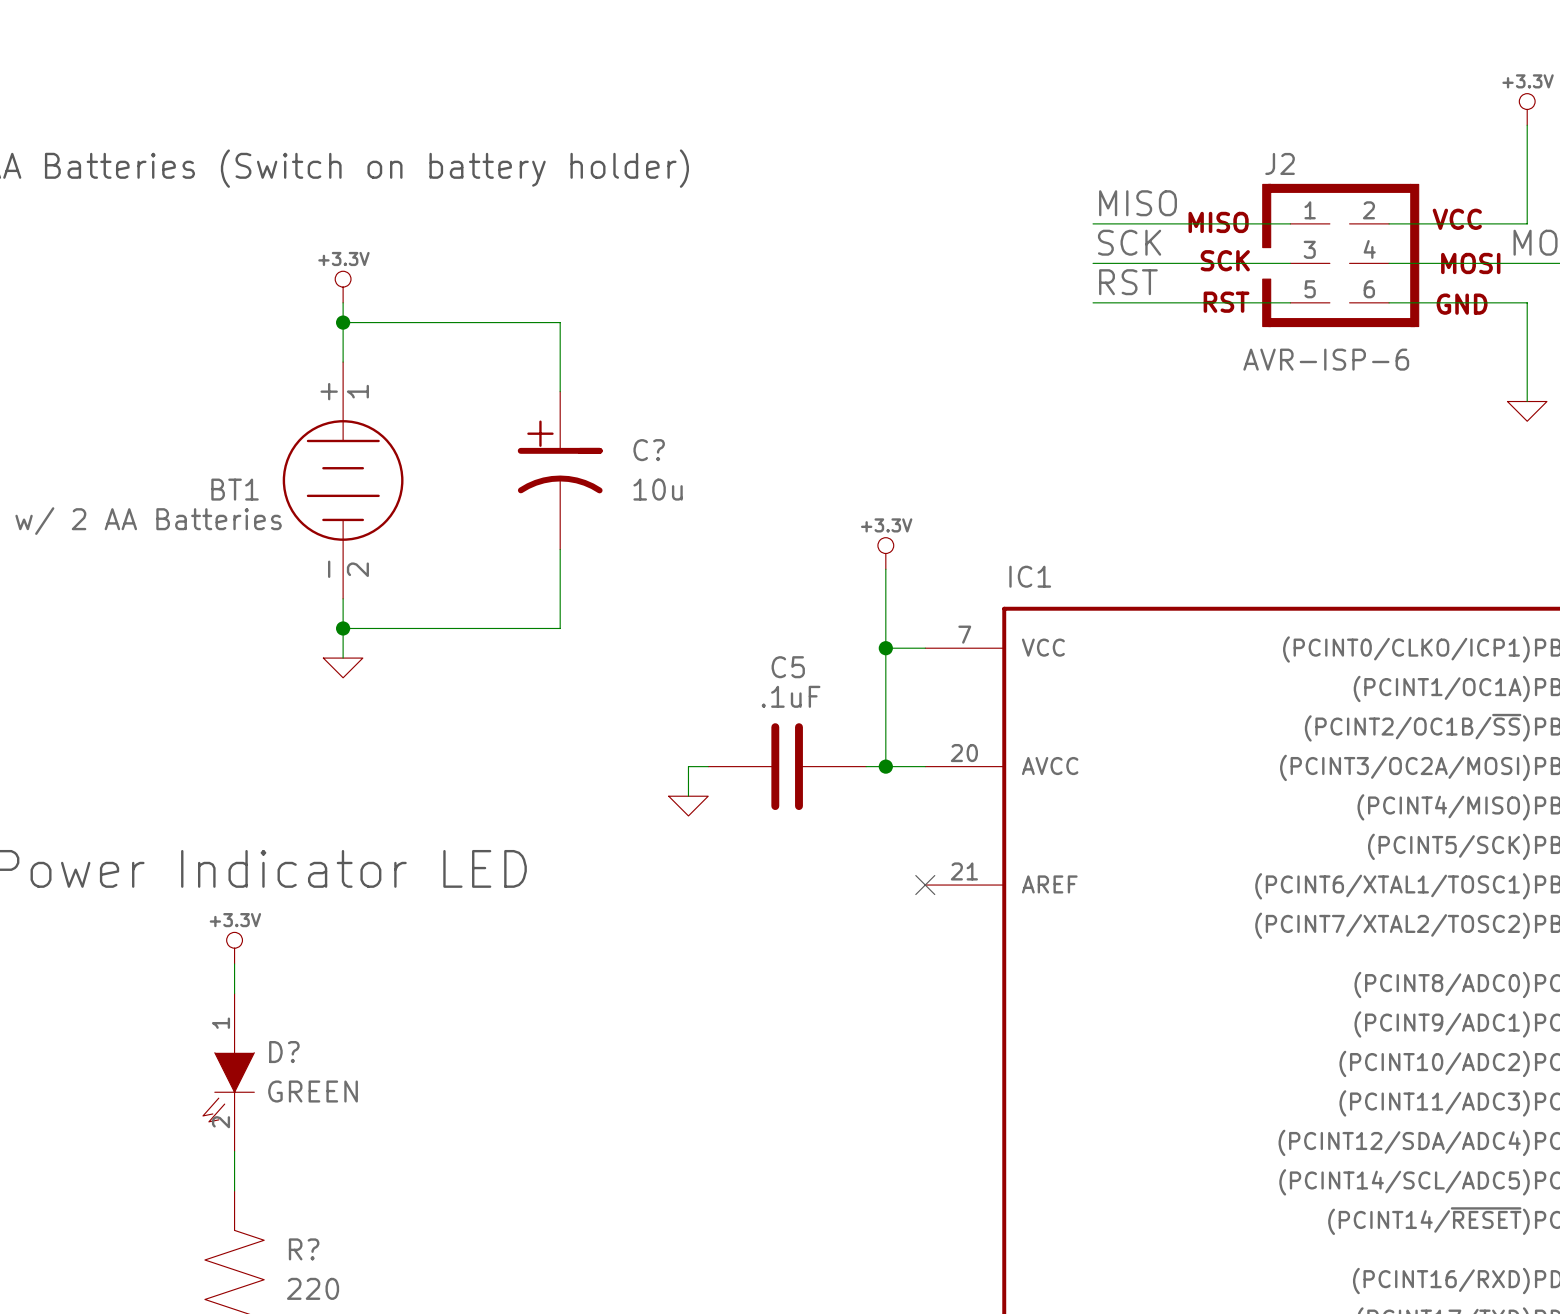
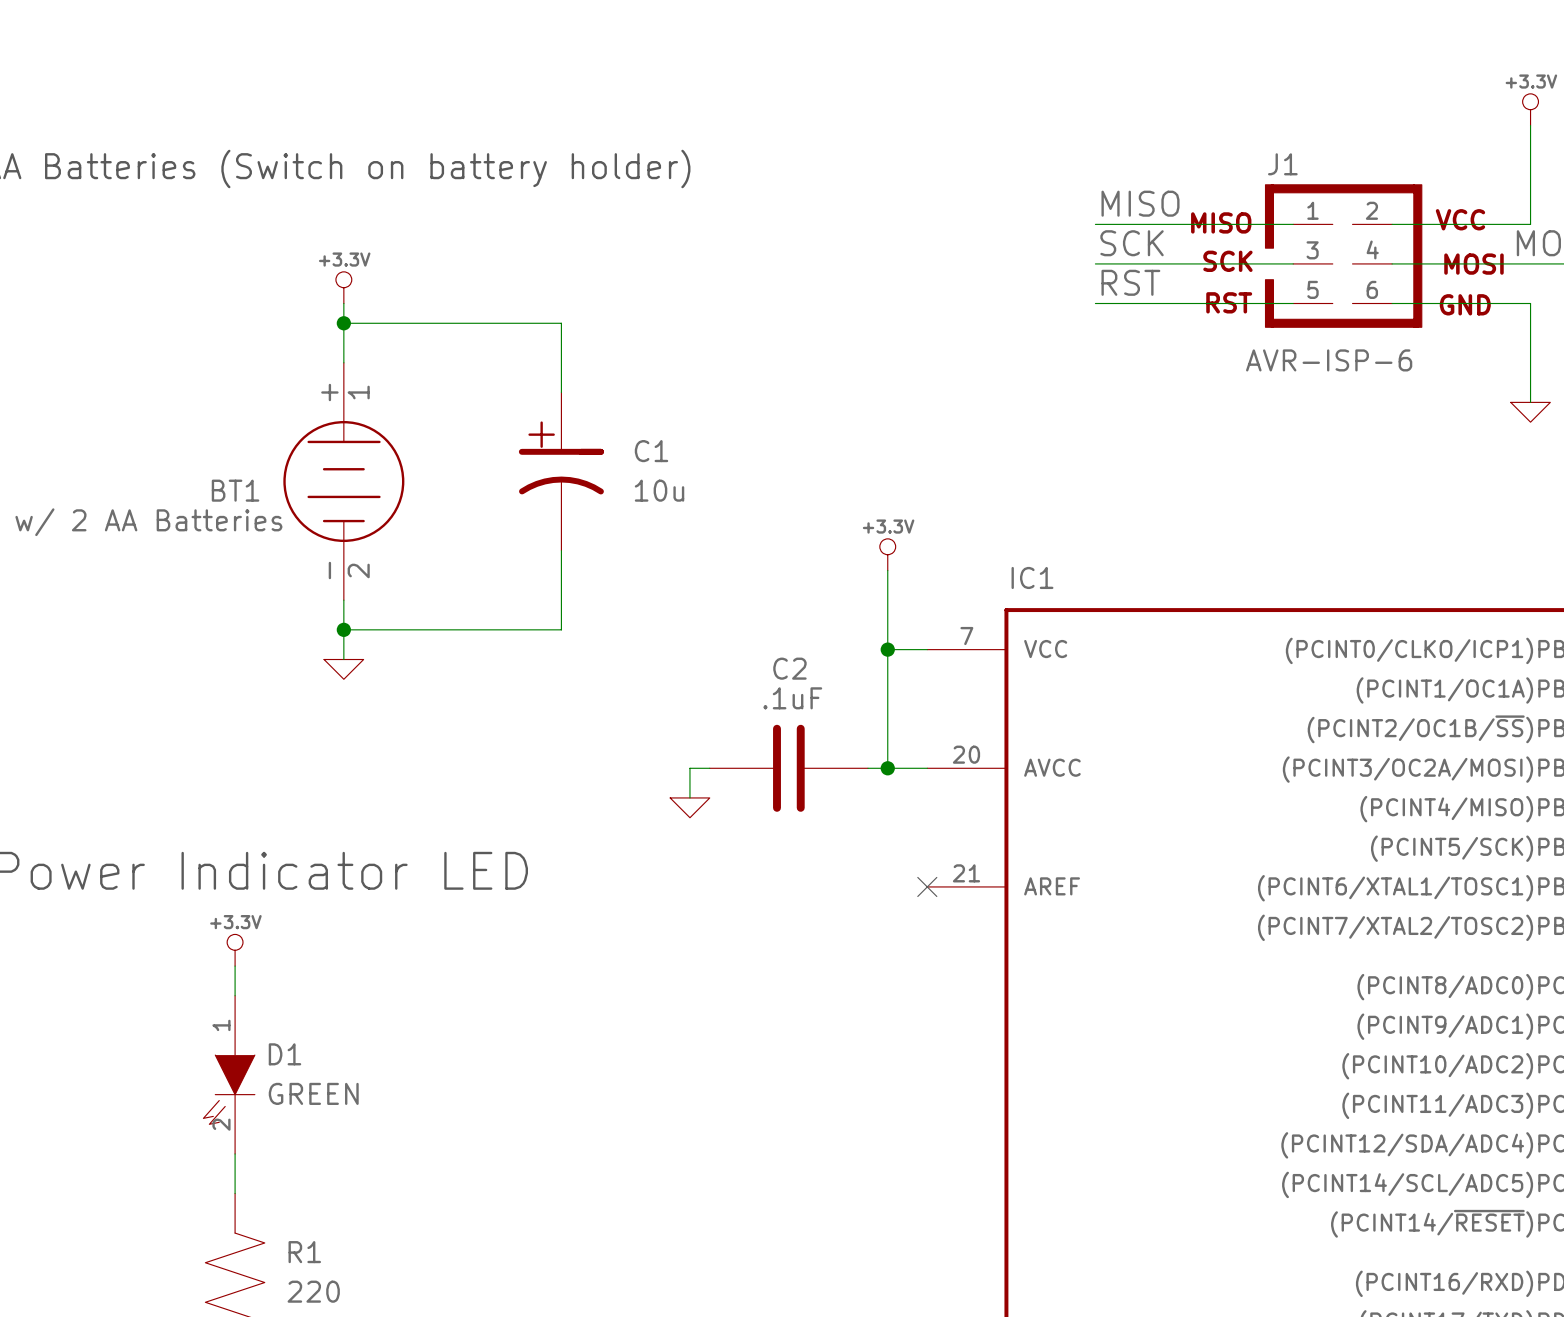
J2 name: J2 (1280, 163) -> J1 (1282, 164)
C? name: C? (649, 450) -> C1 (651, 451)
C5 name: C5 (788, 667) -> C2 (789, 668)
D? name: D? (284, 1052) -> D1 (284, 1054)
R? name: R? (304, 1249) -> R1 (304, 1252)

